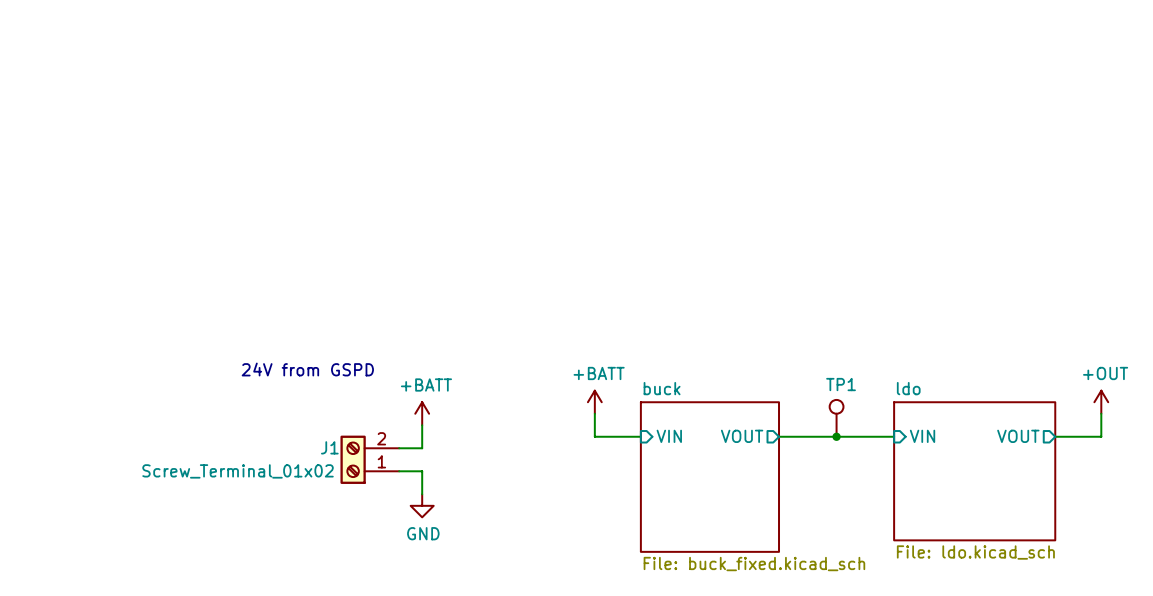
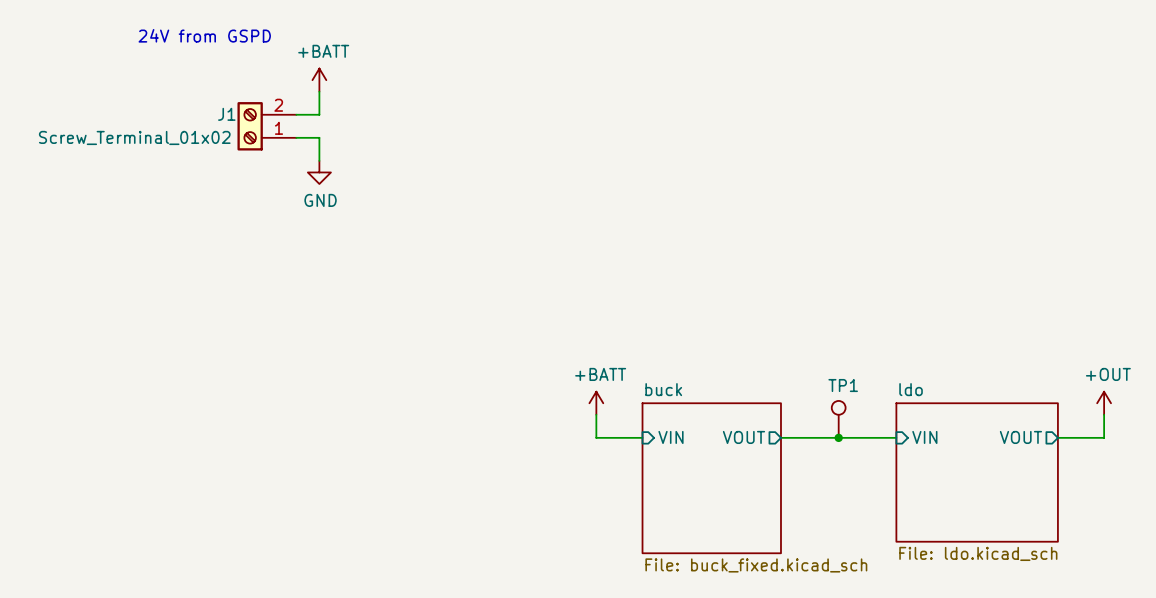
text: none -> 24V from GSPD (204, 35)
power symbol: none -> +BATT (319, 80)
wire: none -> (319, 91) (319, 114) (296, 114)
wire: none -> (296, 137) (319, 137) (319, 160)
power symbol: none -> GND (319, 172)
text: 24V from GSPD (307, 369) -> none
power symbol: +BATT (422, 413) -> none
wire: (422, 425) (422, 448) (399, 448) -> none
J1 position: (369, 459) -> (266, 126)
wire: (399, 471) (422, 471) (422, 494) -> none
power symbol: GND (422, 505) -> none

